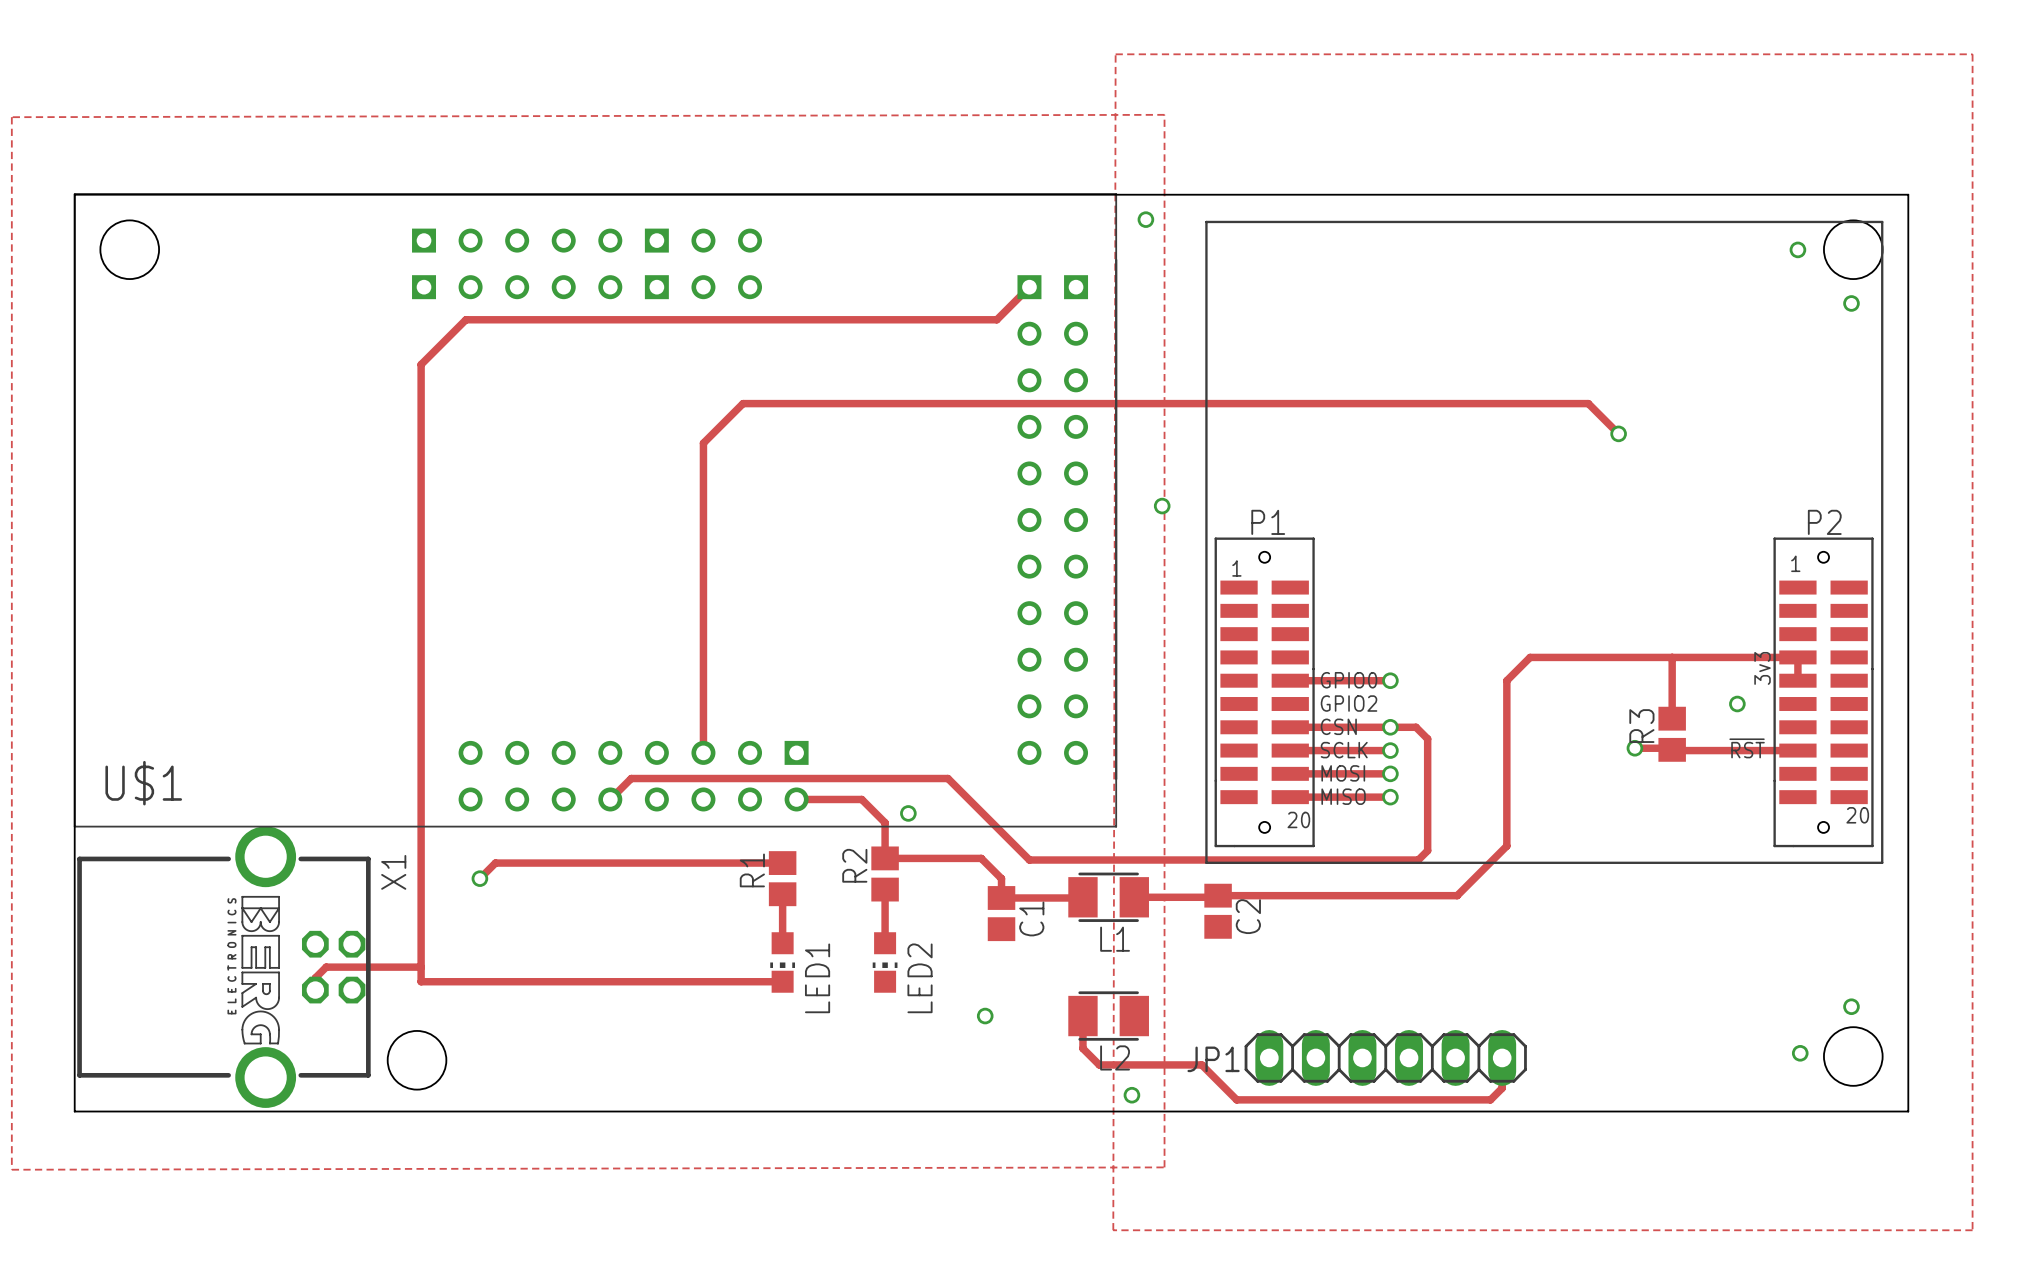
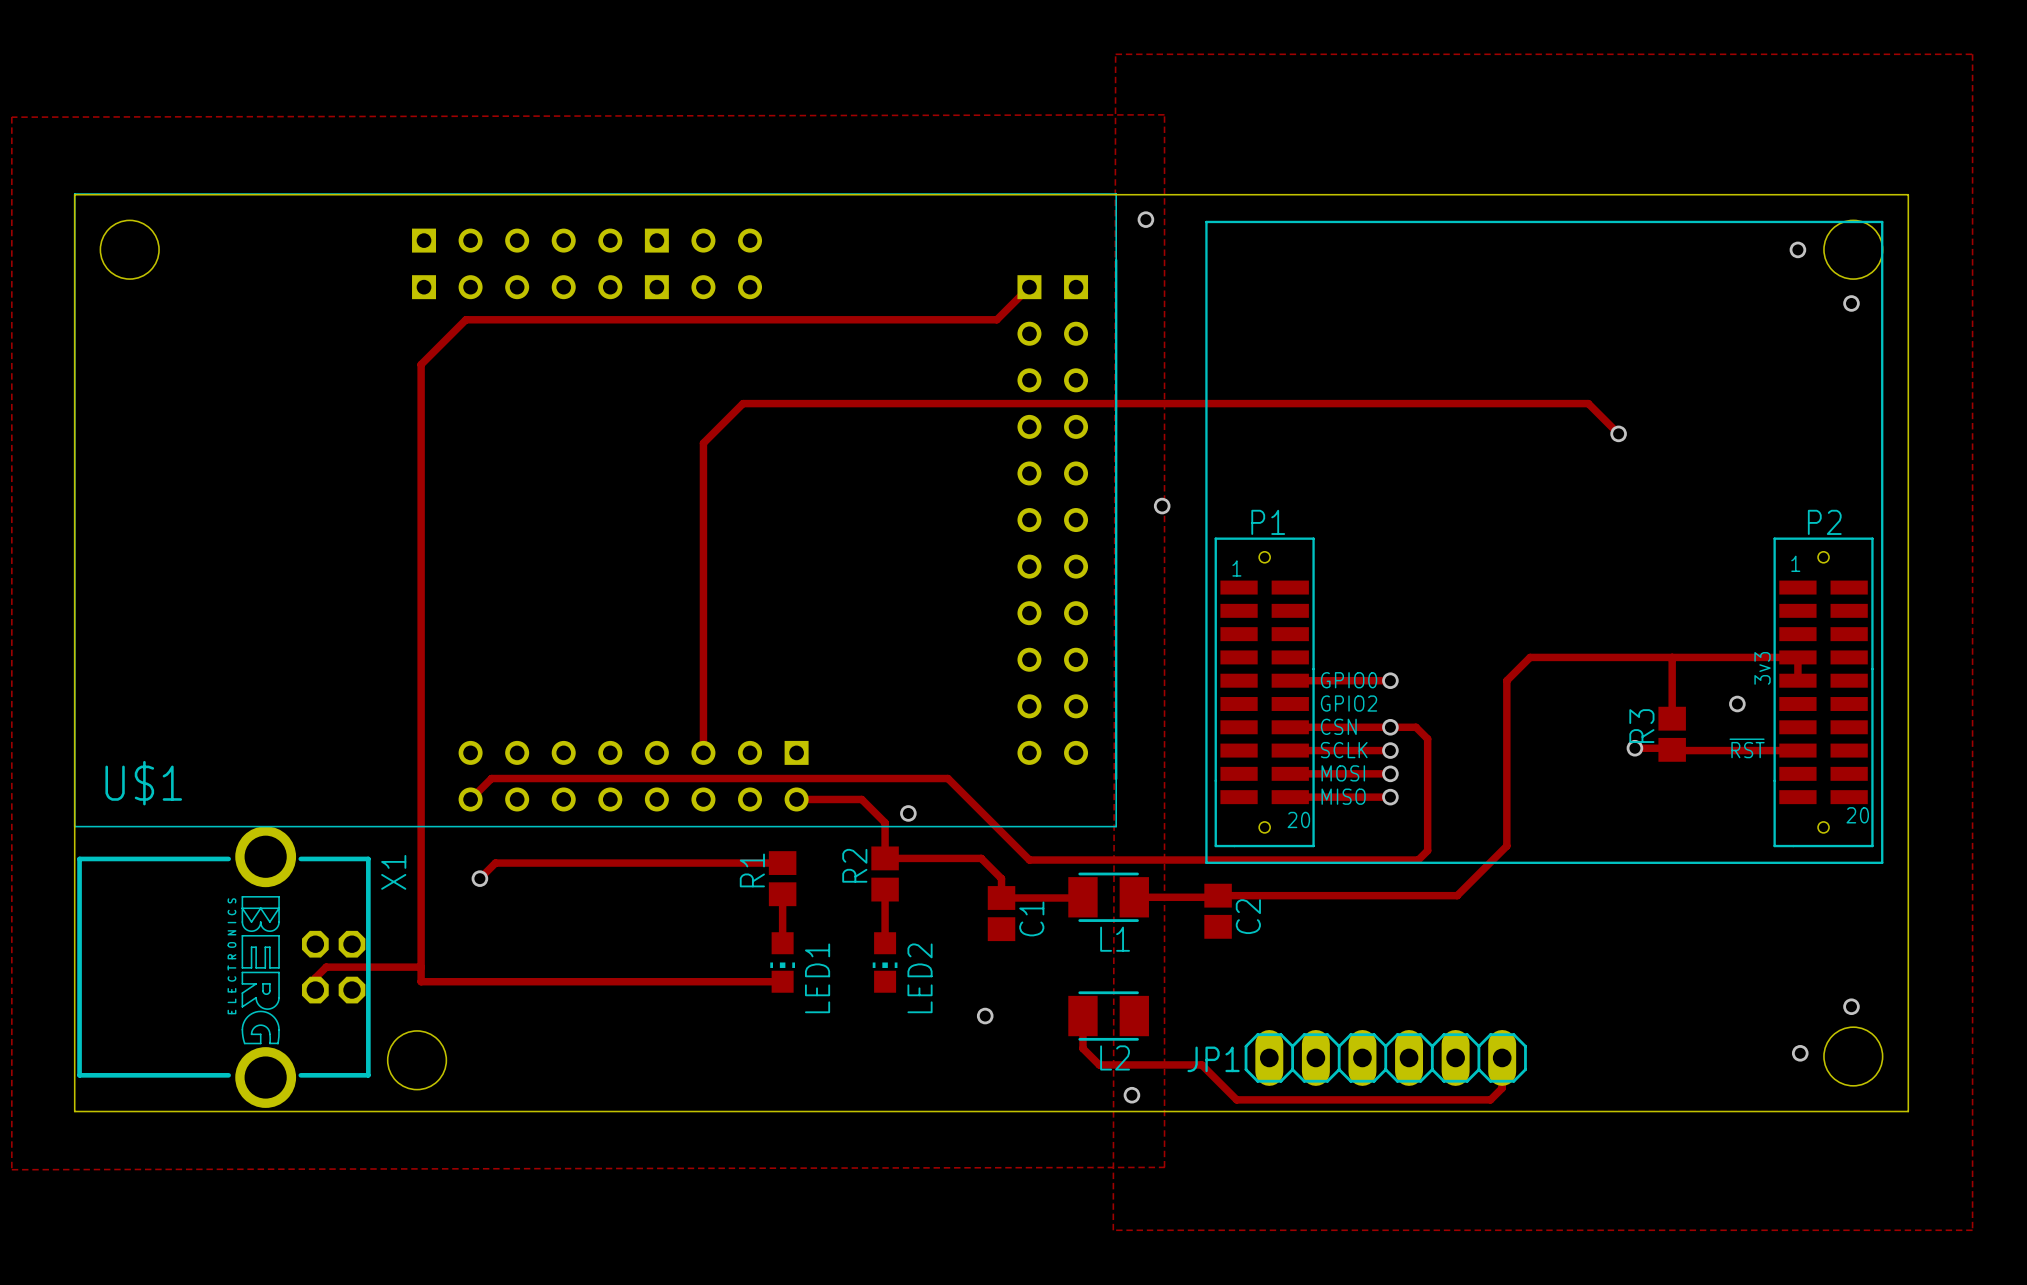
track: (631, 778) (610, 799) -> (631, 778) (491, 778) (470, 799)

